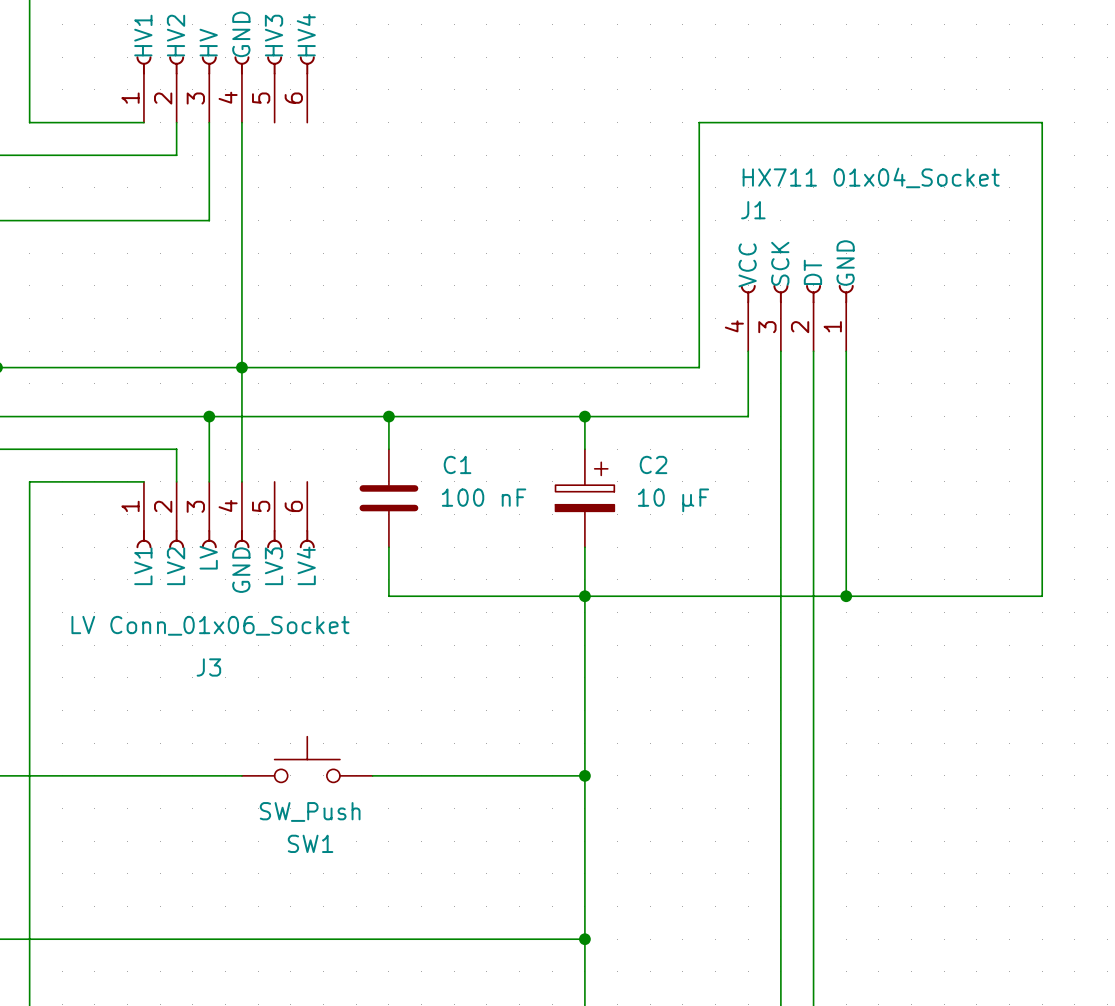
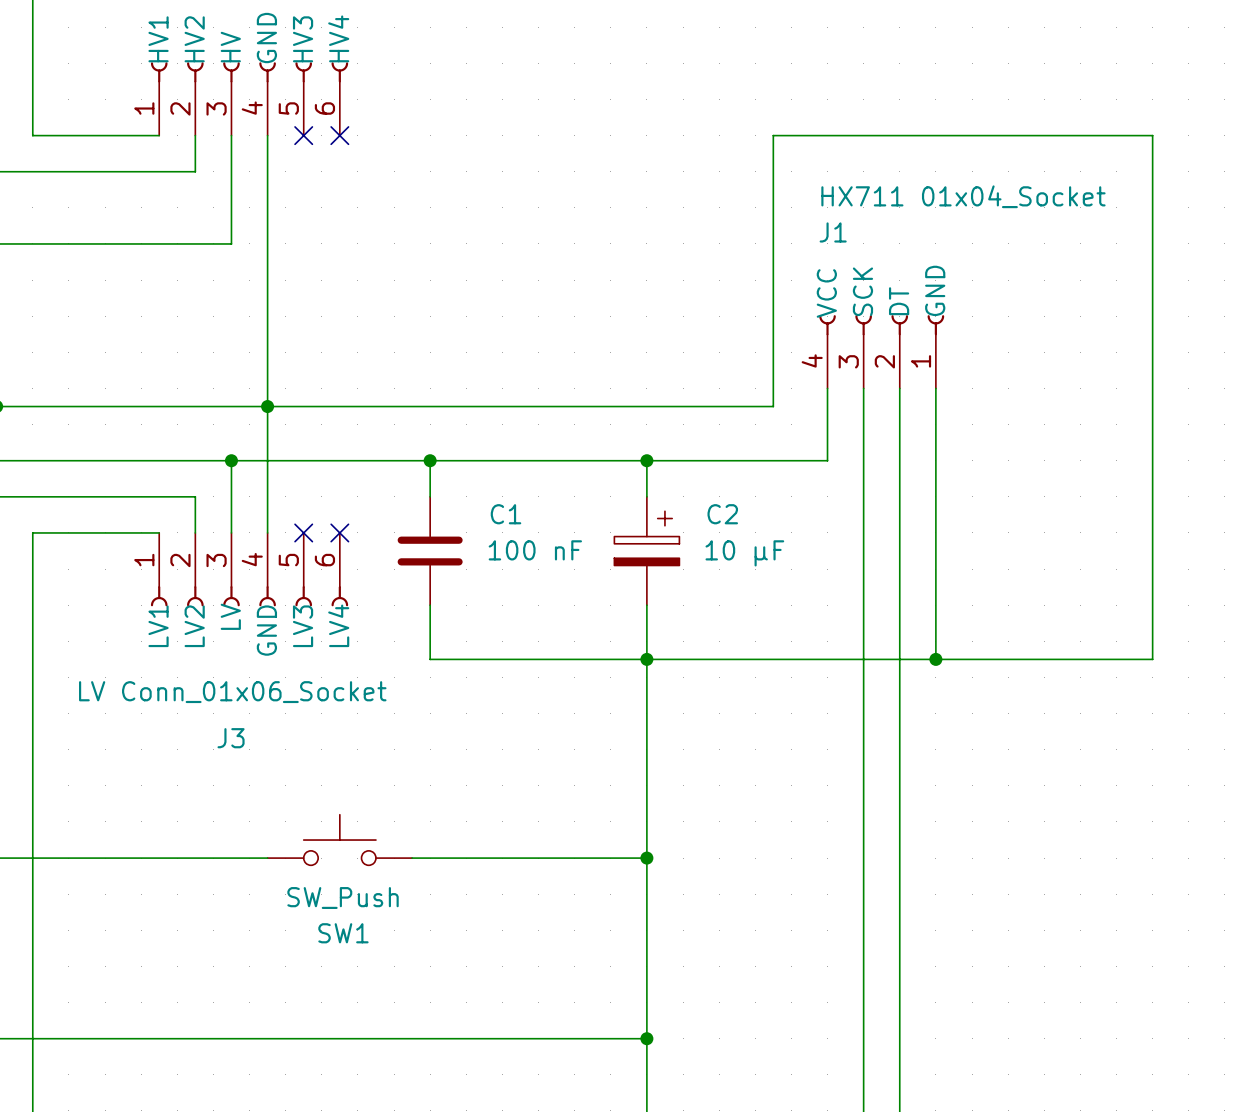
no-connect mark: none -> (303, 135)
no-connect mark: none -> (339, 135)
no-connect mark: none -> (303, 532)
no-connect mark: none -> (339, 532)

